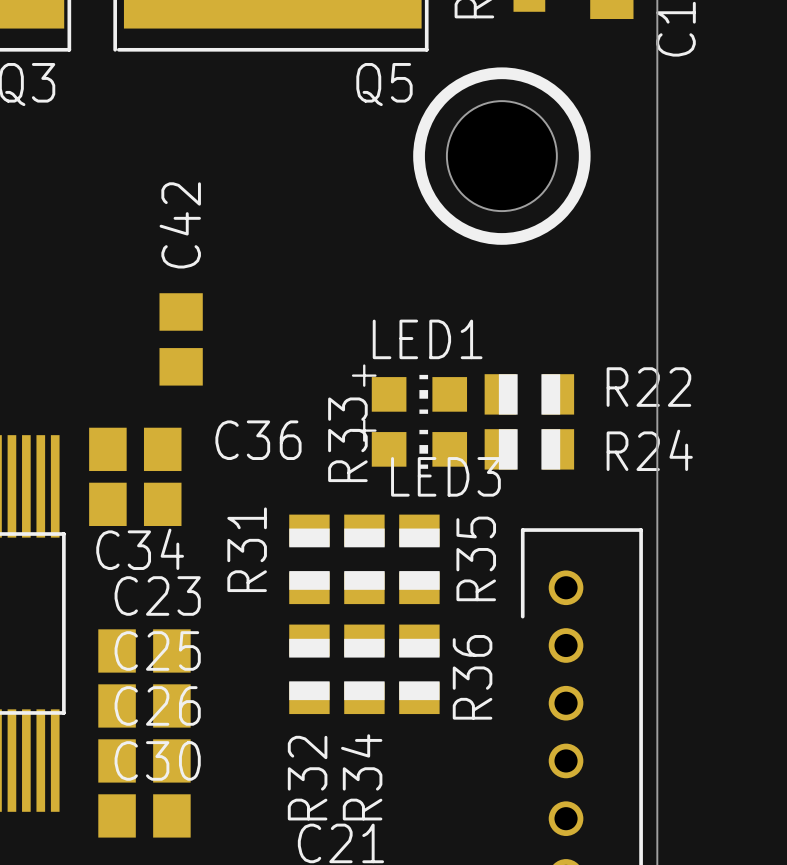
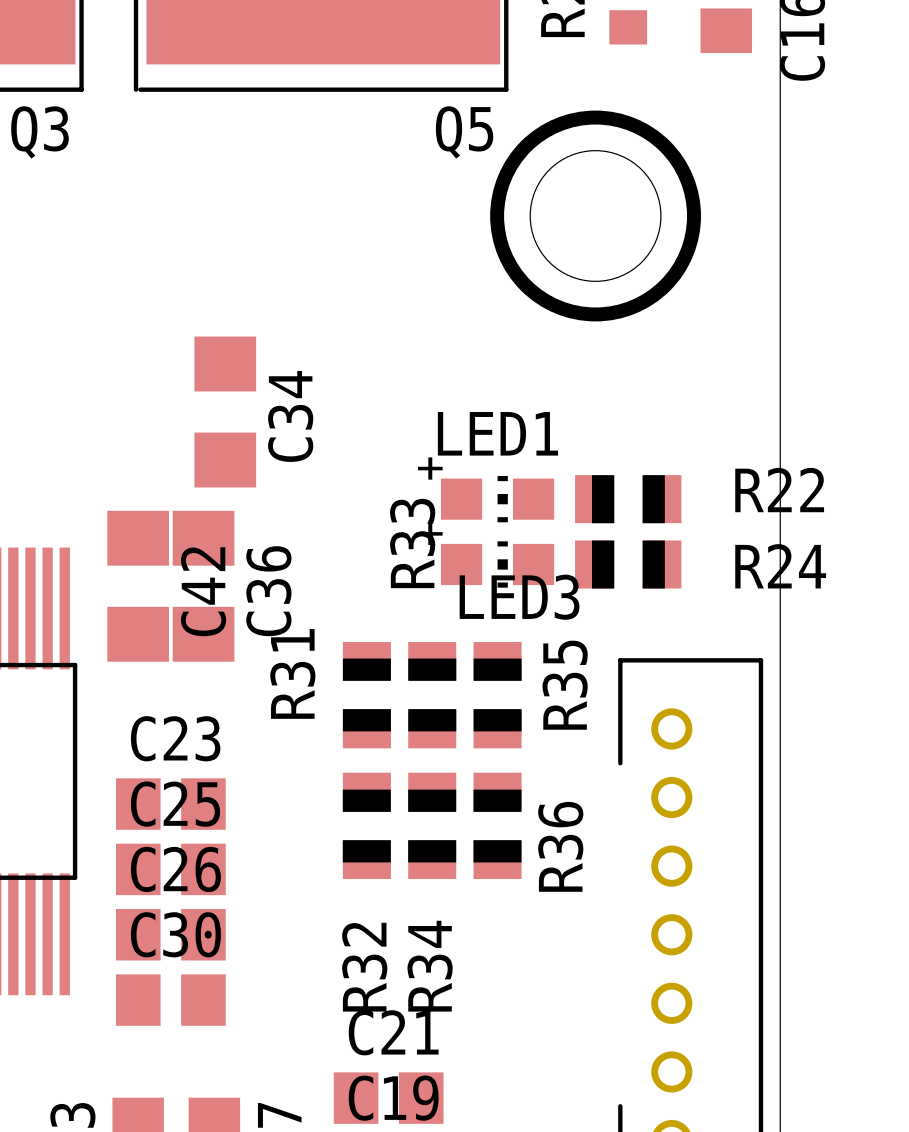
C42 name position: C42 (180, 225) -> C42 (203, 591)
C42 footprint: [159, 293, 203, 386] -> [107, 510, 170, 662]
C36 footprint: [89, 427, 182, 472] -> [172, 510, 235, 662]
C36 name position: C36 (258, 440) -> C36 (268, 591)
C34 footprint: [89, 482, 182, 527] -> [194, 336, 257, 488]

